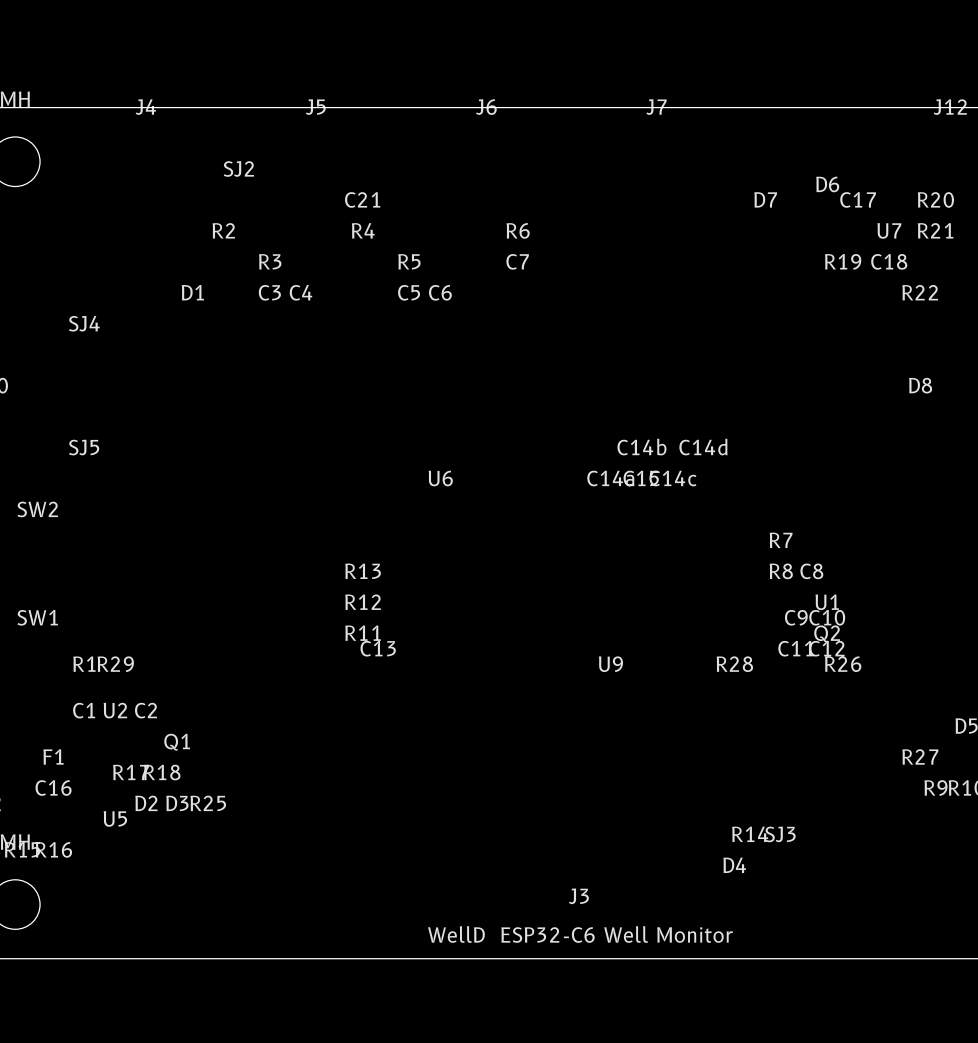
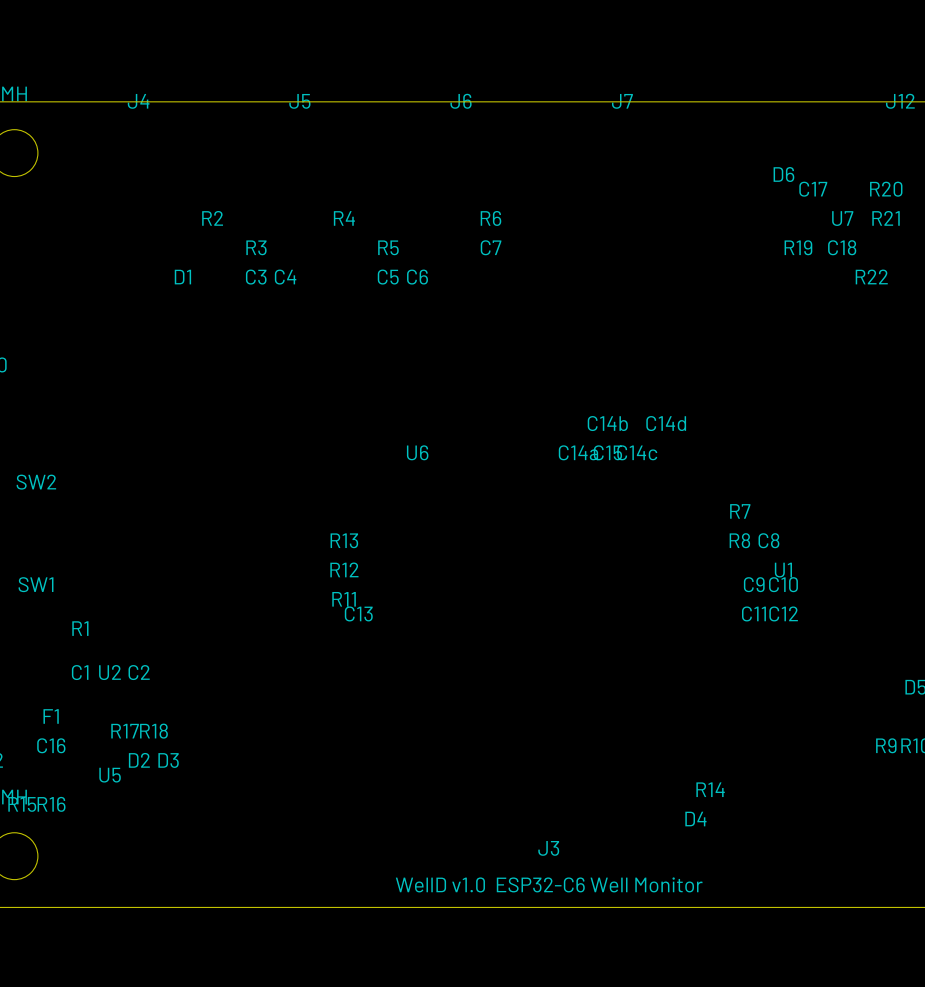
SJ2: (238, 168) -> none
C21: (362, 199) -> none
D7: (765, 199) -> none
SJ4: (84, 323) -> none
D8: (920, 385) -> none
SJ5: (84, 447) -> none
Q2: (827, 633) -> none
R29: (115, 664) -> none
U9: (610, 664) -> none
R28: (734, 664) -> none
R26: (843, 664) -> none
Q1: (177, 742) -> none
R27: (920, 756) -> none
R25: (208, 803) -> none
SJ3: (780, 834) -> none
text: WellD ESP32-C6 Well Monitor (580, 934) -> WellD v1.0 ESP32-C6 Well Monitor (549, 884)

